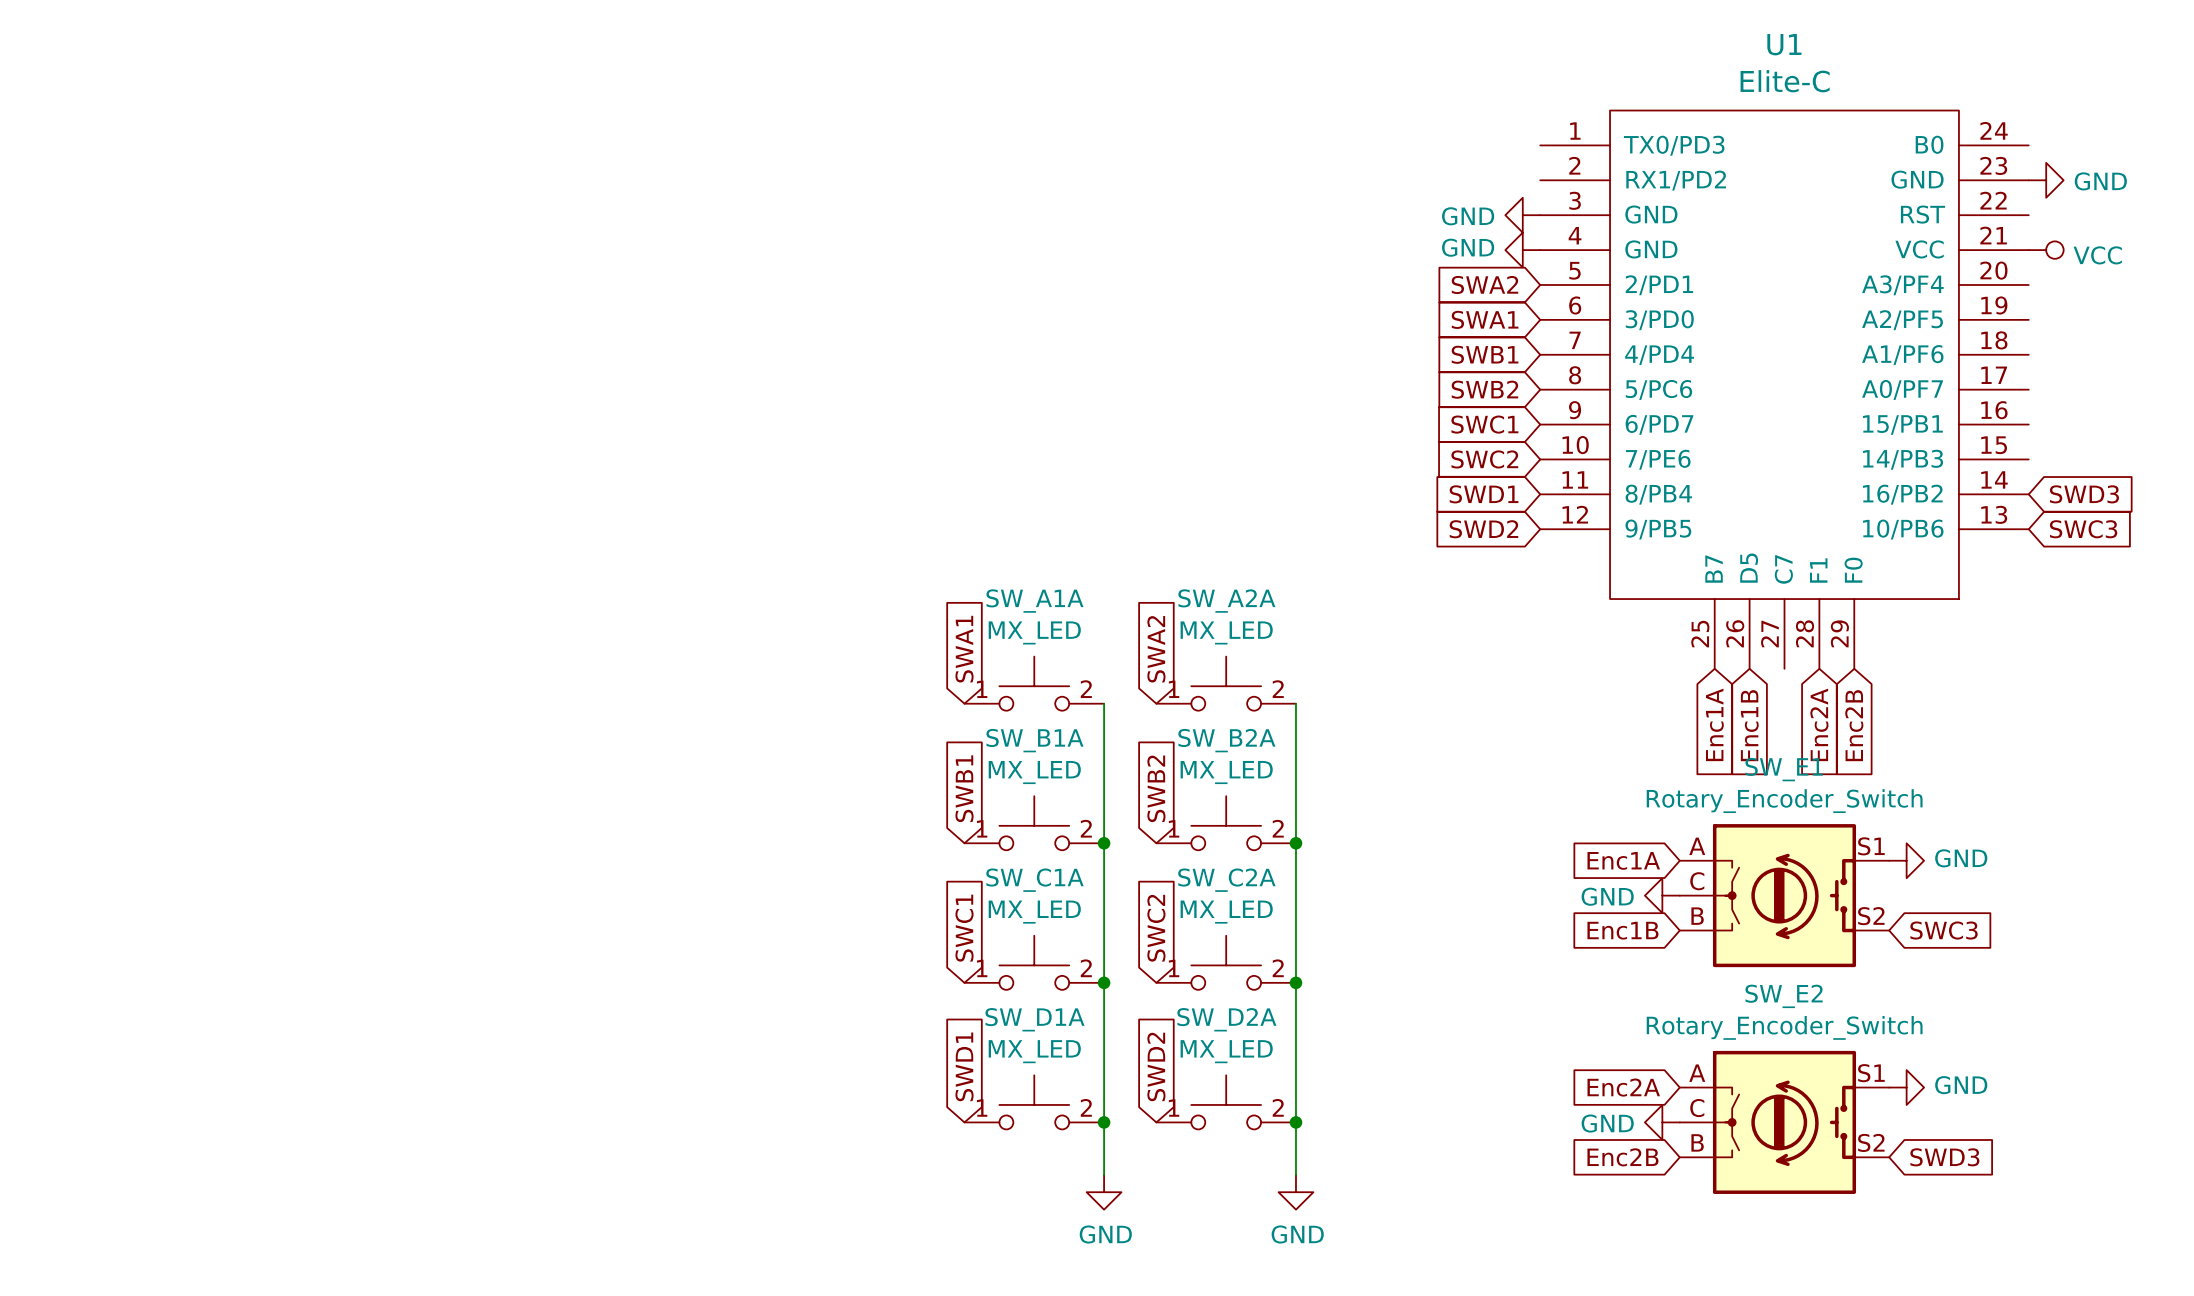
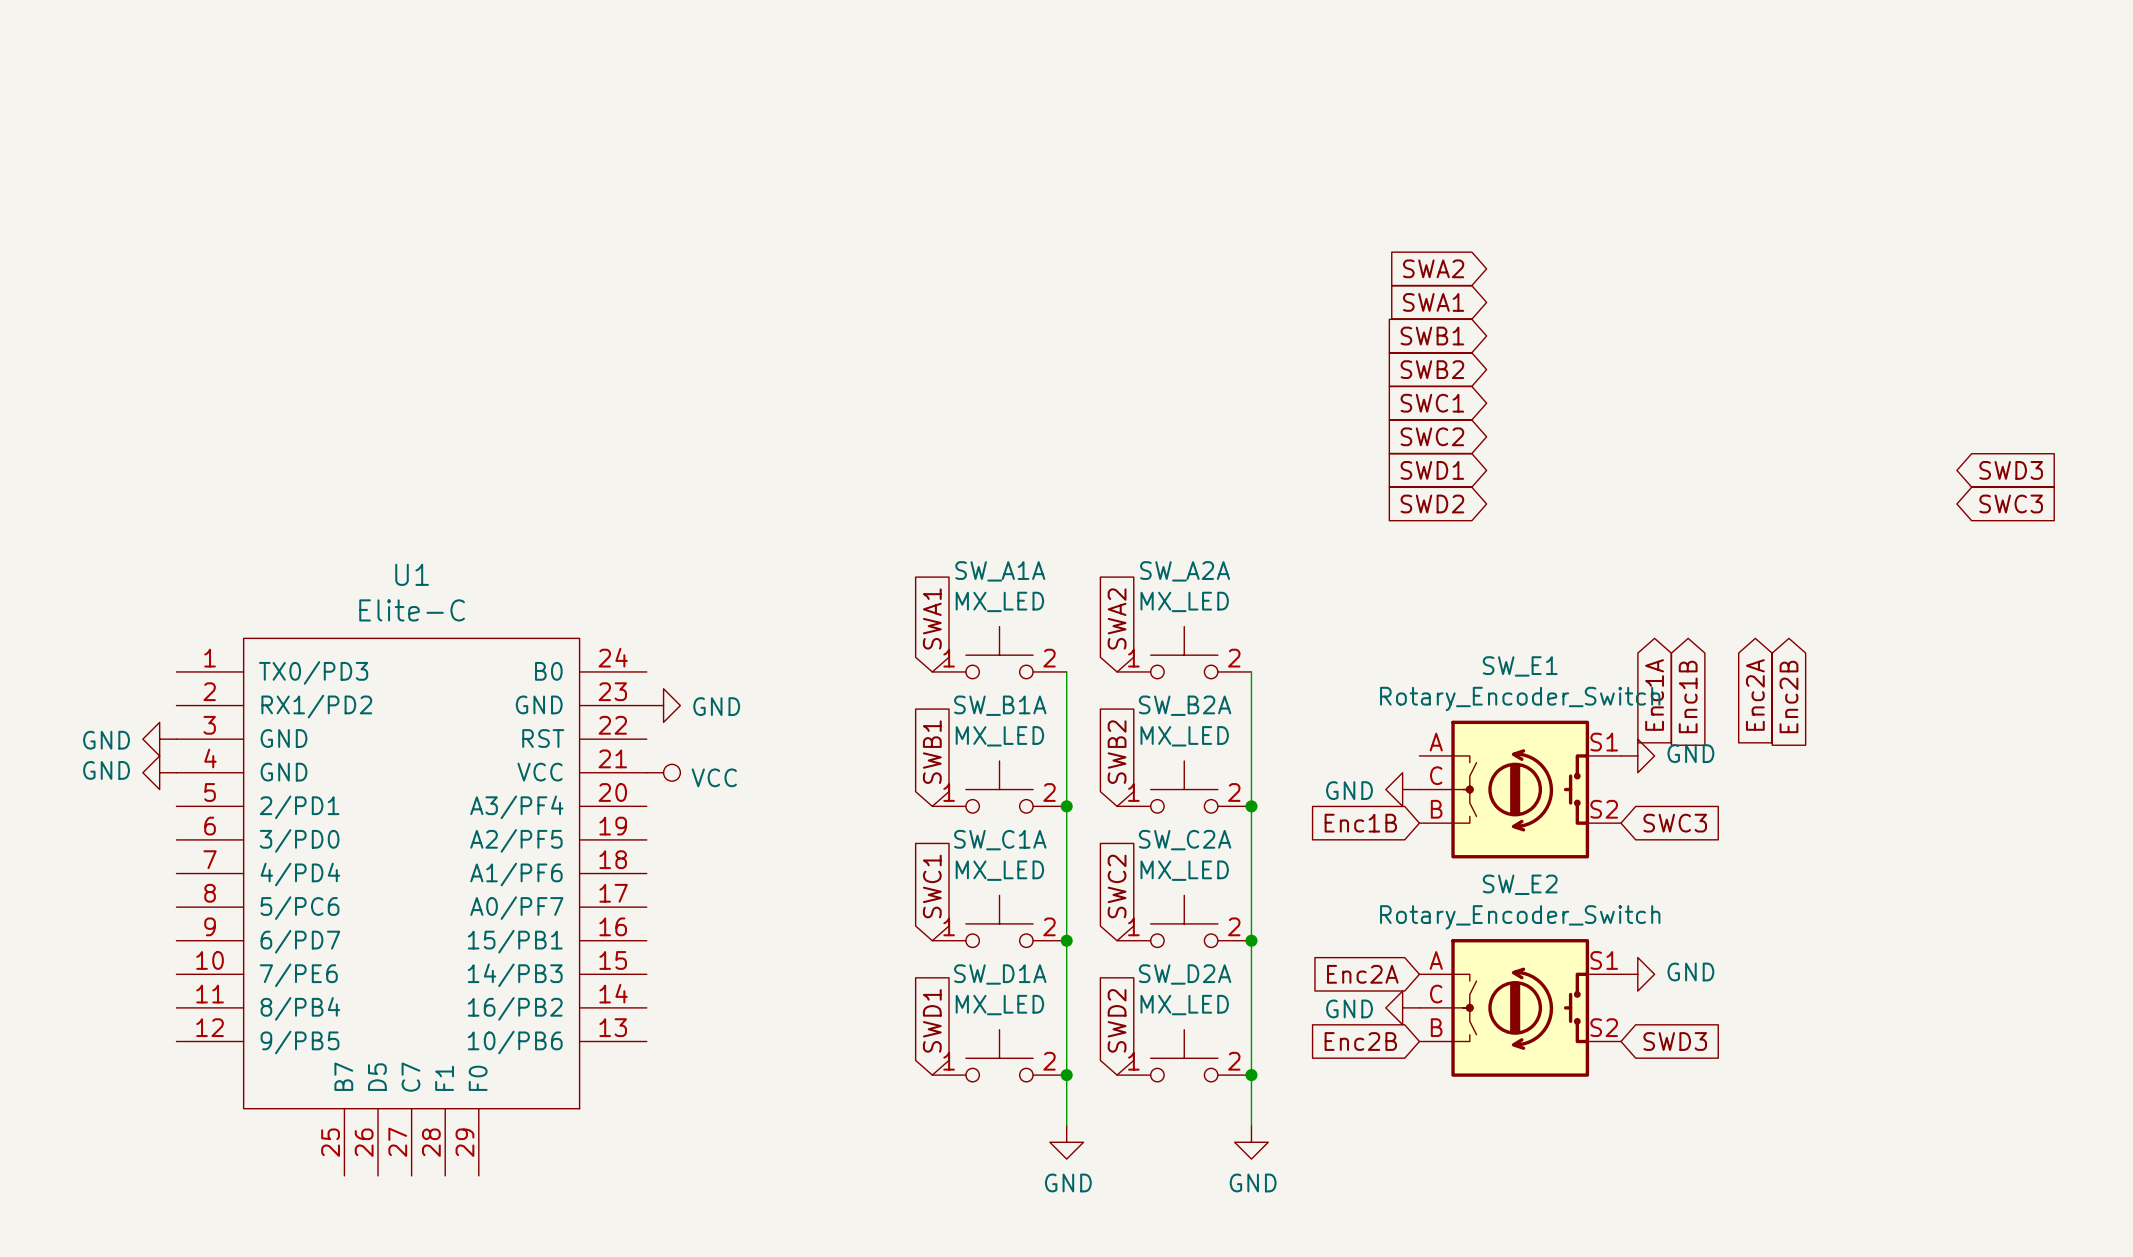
power symbol: GND (2046, 180) -> none
power symbol: GND (1522, 215) -> none
power symbol: GND (1522, 250) -> none
power symbol: VCC (2046, 250) -> none
U1 position: (1784, 389) -> (411, 907)
power symbol: none -> GND (663, 705)
power symbol: none -> GND (159, 739)
power symbol: none -> GND (1637, 755)
power symbol: none -> GND (159, 772)
power symbol: none -> VCC (663, 772)
power symbol: none -> GND (1402, 789)
global label: Enc1A (1623, 860) -> SWC3 (1675, 823)
power symbol: GND (1906, 860) -> none
power symbol: GND (1662, 895) -> none
SW_E1 position: (1784, 895) -> (1520, 789)
global label position: Enc1B (1622, 930) -> Enc1B (1360, 823)
global label: SWC3 (1944, 930) -> none
global label: none -> Enc2A (1362, 974)
power symbol: none -> GND (1637, 974)
power symbol: none -> GND (1402, 1007)
global label: Enc2A (1623, 1087) -> SWD3 (1675, 1041)
power symbol: GND (1906, 1087) -> none
power symbol: GND (1662, 1122) -> none
SW_E2 position: (1784, 1122) -> (1520, 1007)
global label position: Enc2B (1622, 1157) -> Enc2B (1360, 1041)
global label: SWD3 (1944, 1157) -> none

